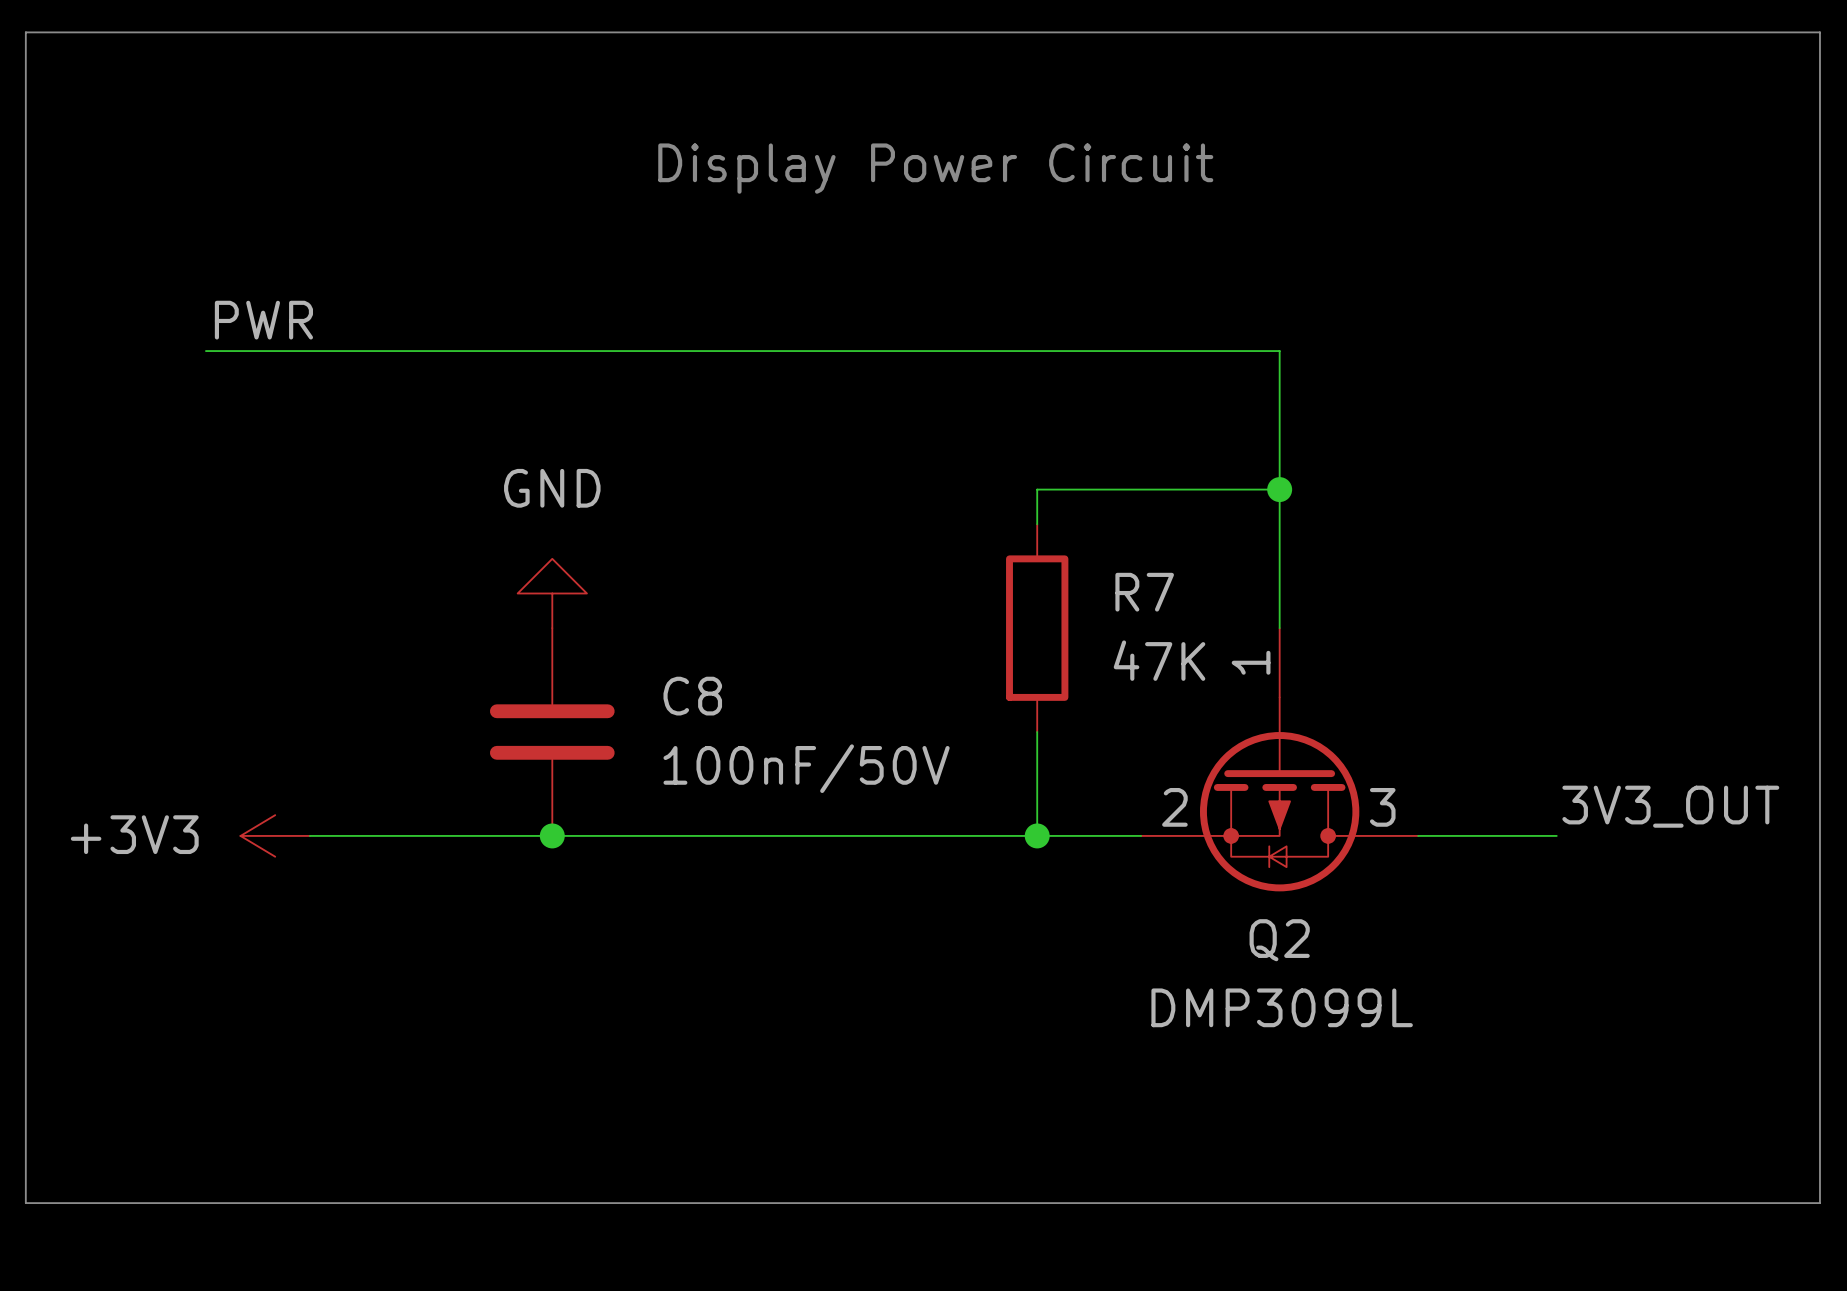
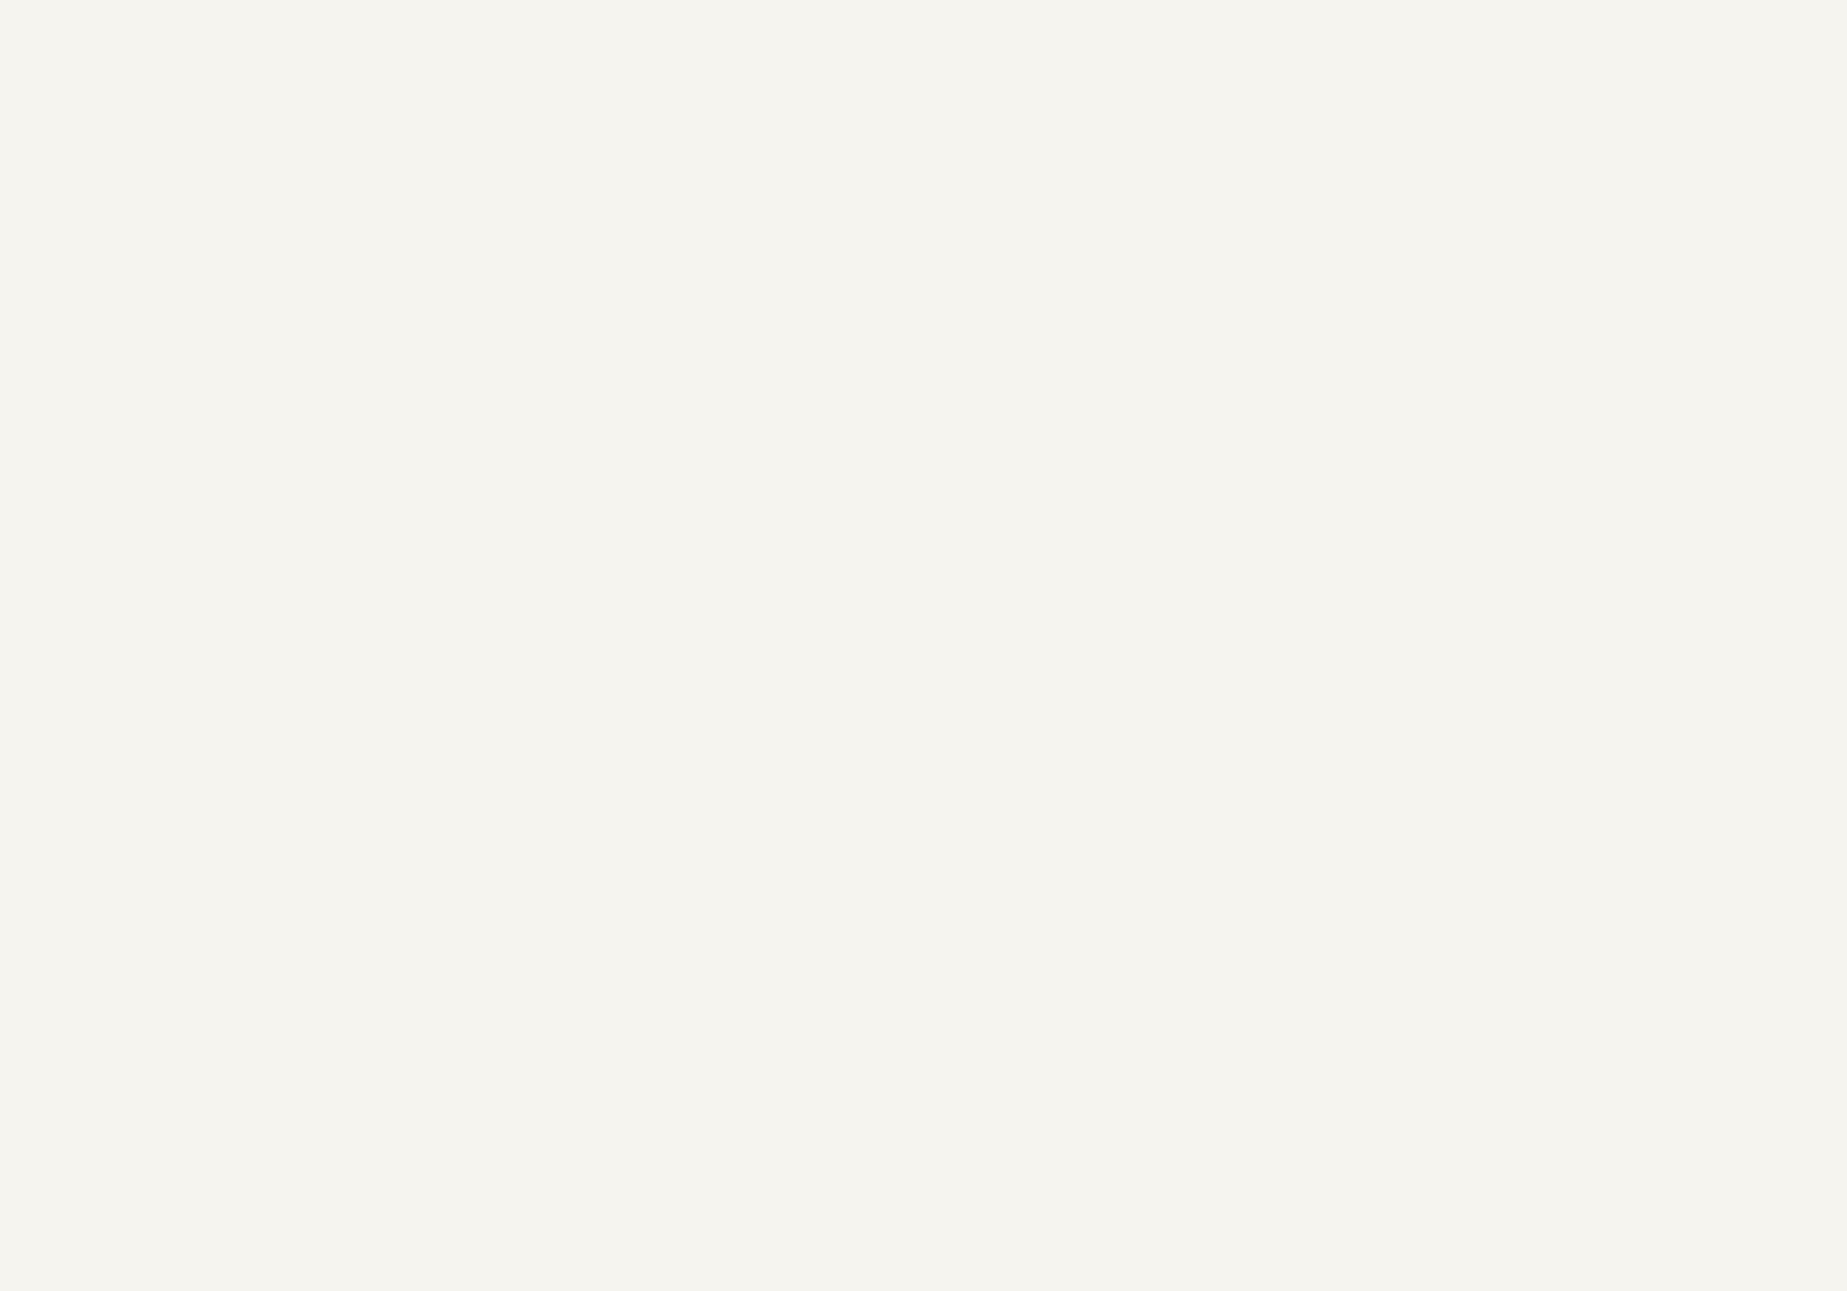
line: (25, 32) (1819, 32) (1819, 1203) (25, 1203) (25, 32) -> none
text: Display Power Circuit (935, 168) -> none
label: PWR (263, 320) -> none
wire: (205, 351) (1279, 351) (1279, 628) -> none
wire: (1279, 489) (1037, 489) (1037, 524) -> none
junction: (1279, 489) -> none
power symbol: GND (552, 593) -> none
R7: 47K (1037, 628) -> none
C8: 100nF/50V (552, 732) -> none
wire: (1037, 732) (1037, 835) -> none
Q2: DMP3099L (1279, 759) -> none
label: 3V3_OUT (1670, 806) -> none
power symbol: +3V3 (275, 835) -> none
wire: (309, 835) (1141, 835) -> none
junction: (552, 835) -> none
junction: (1037, 835) -> none
wire: (1418, 835) (1556, 835) -> none

